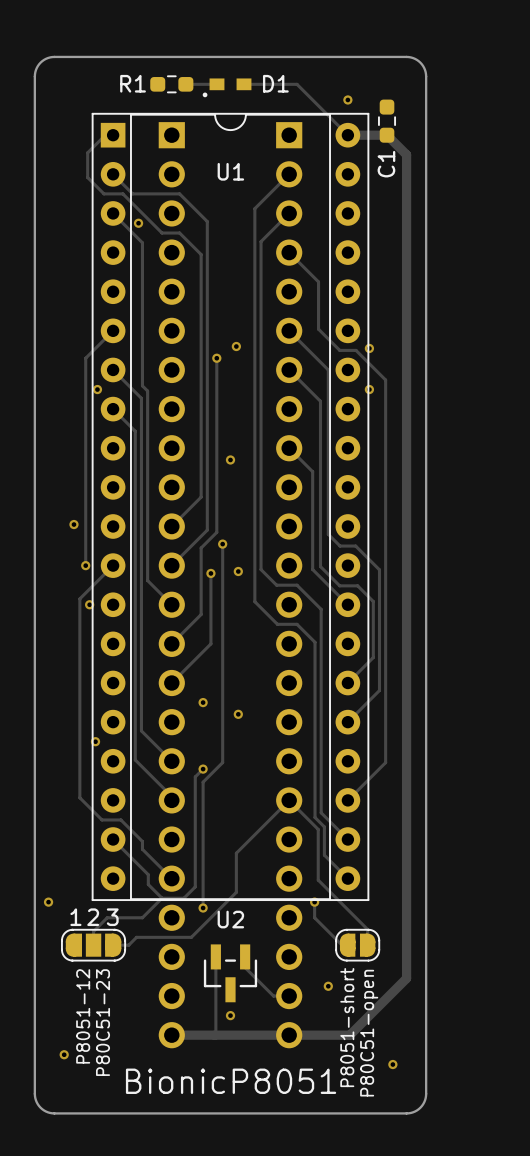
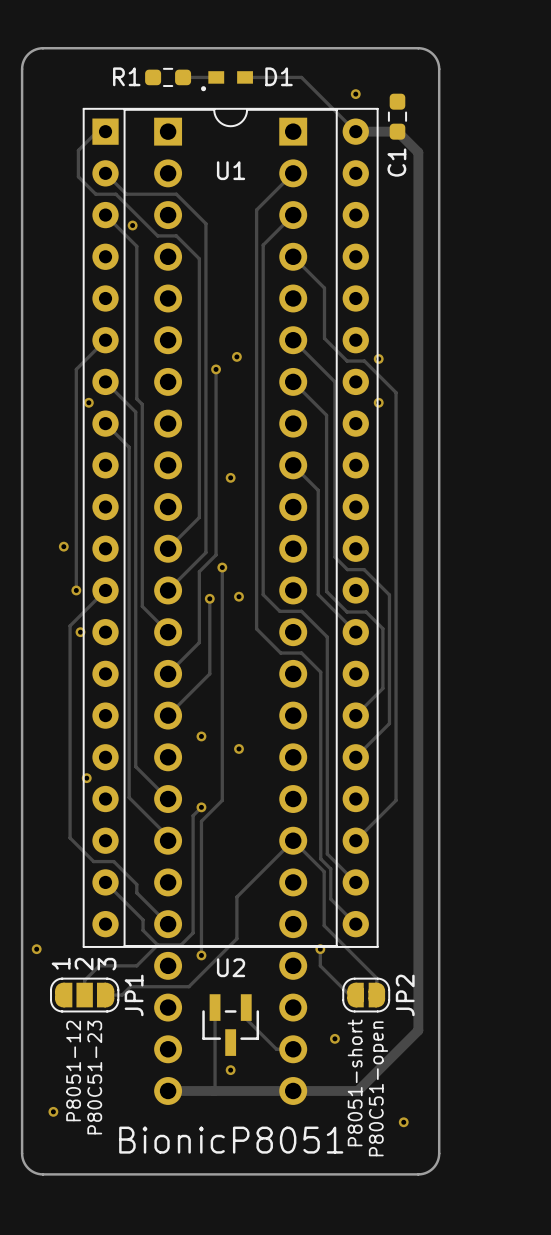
JP1 text rotation: 0° (75, 917) -> 90° counterclockwise (61, 963)
text rotation: 0° (93, 917) -> 90° counterclockwise (84, 964)
JP1 text rotation: 0° (112, 917) -> 90° counterclockwise (106, 964)
JP1 name: none -> JP1 (134, 995)
JP2 name: none -> JP2 (405, 995)

